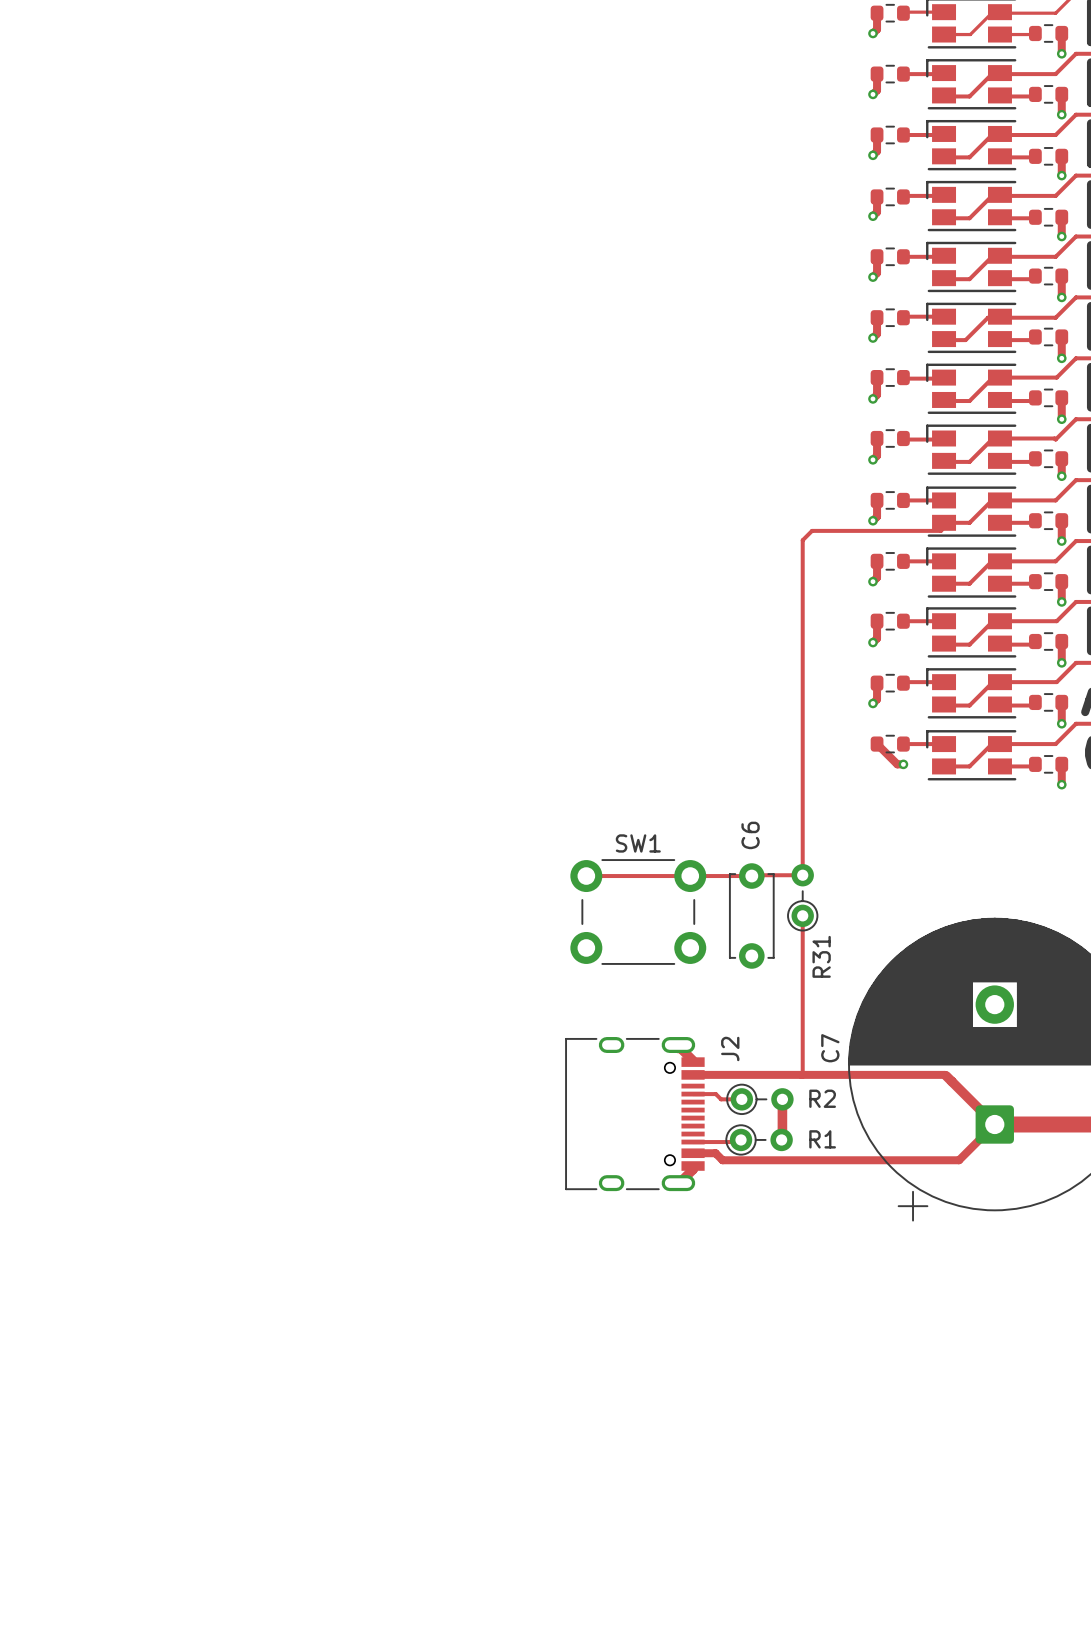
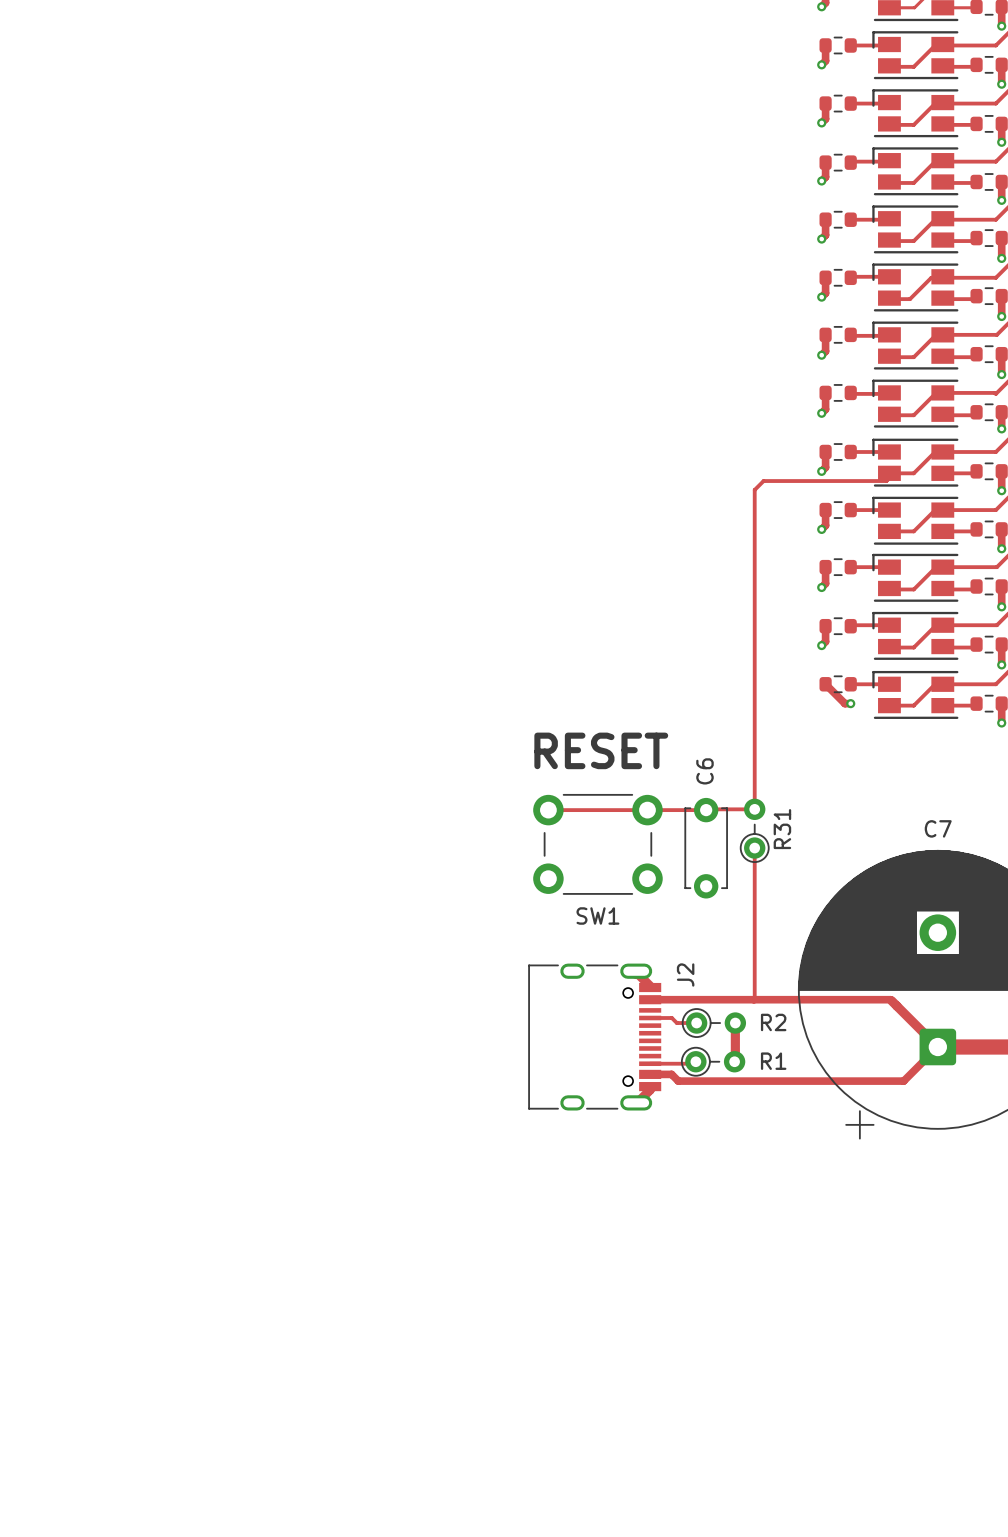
text: none -> RESET (601, 750)
SW1 name position: SW1 (638, 843) -> SW1 (597, 916)
R31 name position: R31 (821, 956) -> R31 (782, 829)
C7 name rotation: 0° (830, 1048) -> 90° clockwise (938, 828)
C7 name position: C7 (830, 1048) -> C7 (938, 828)

